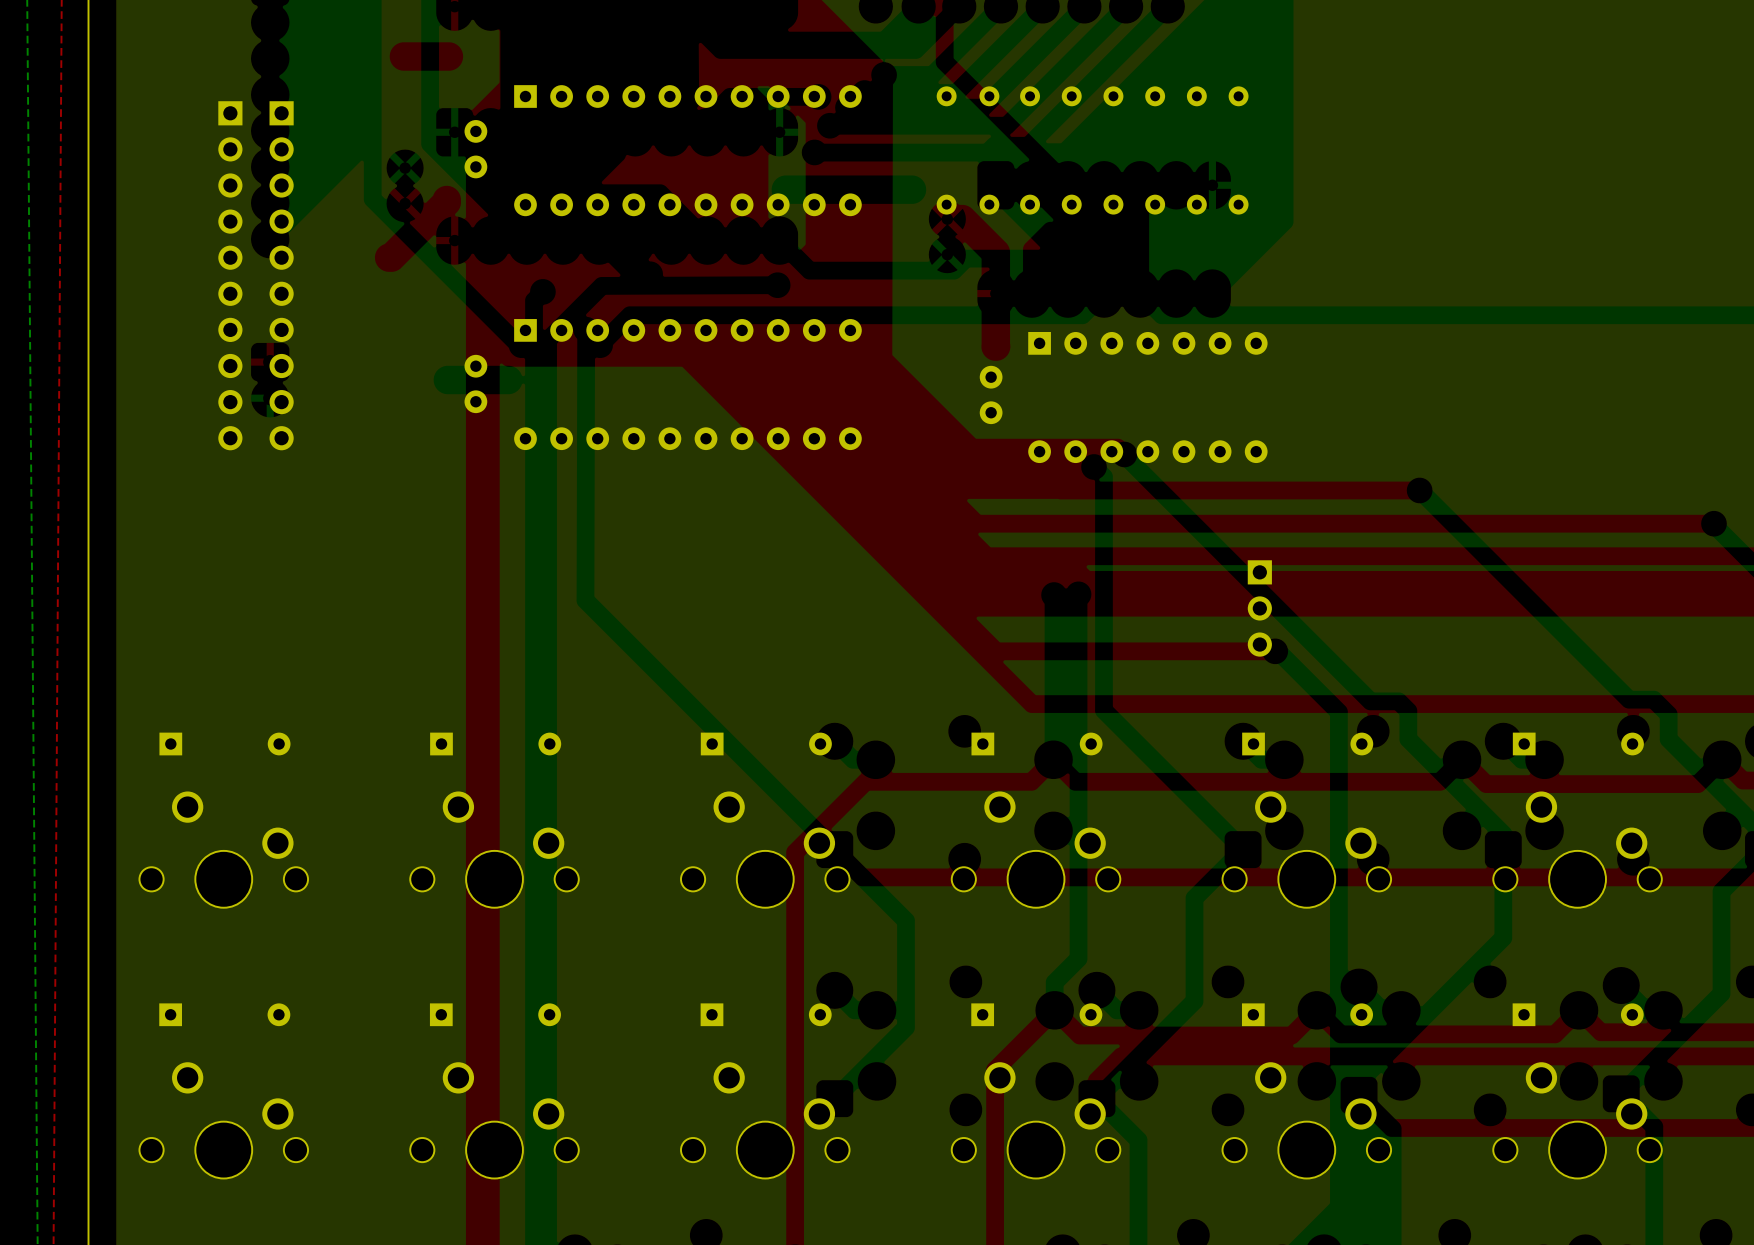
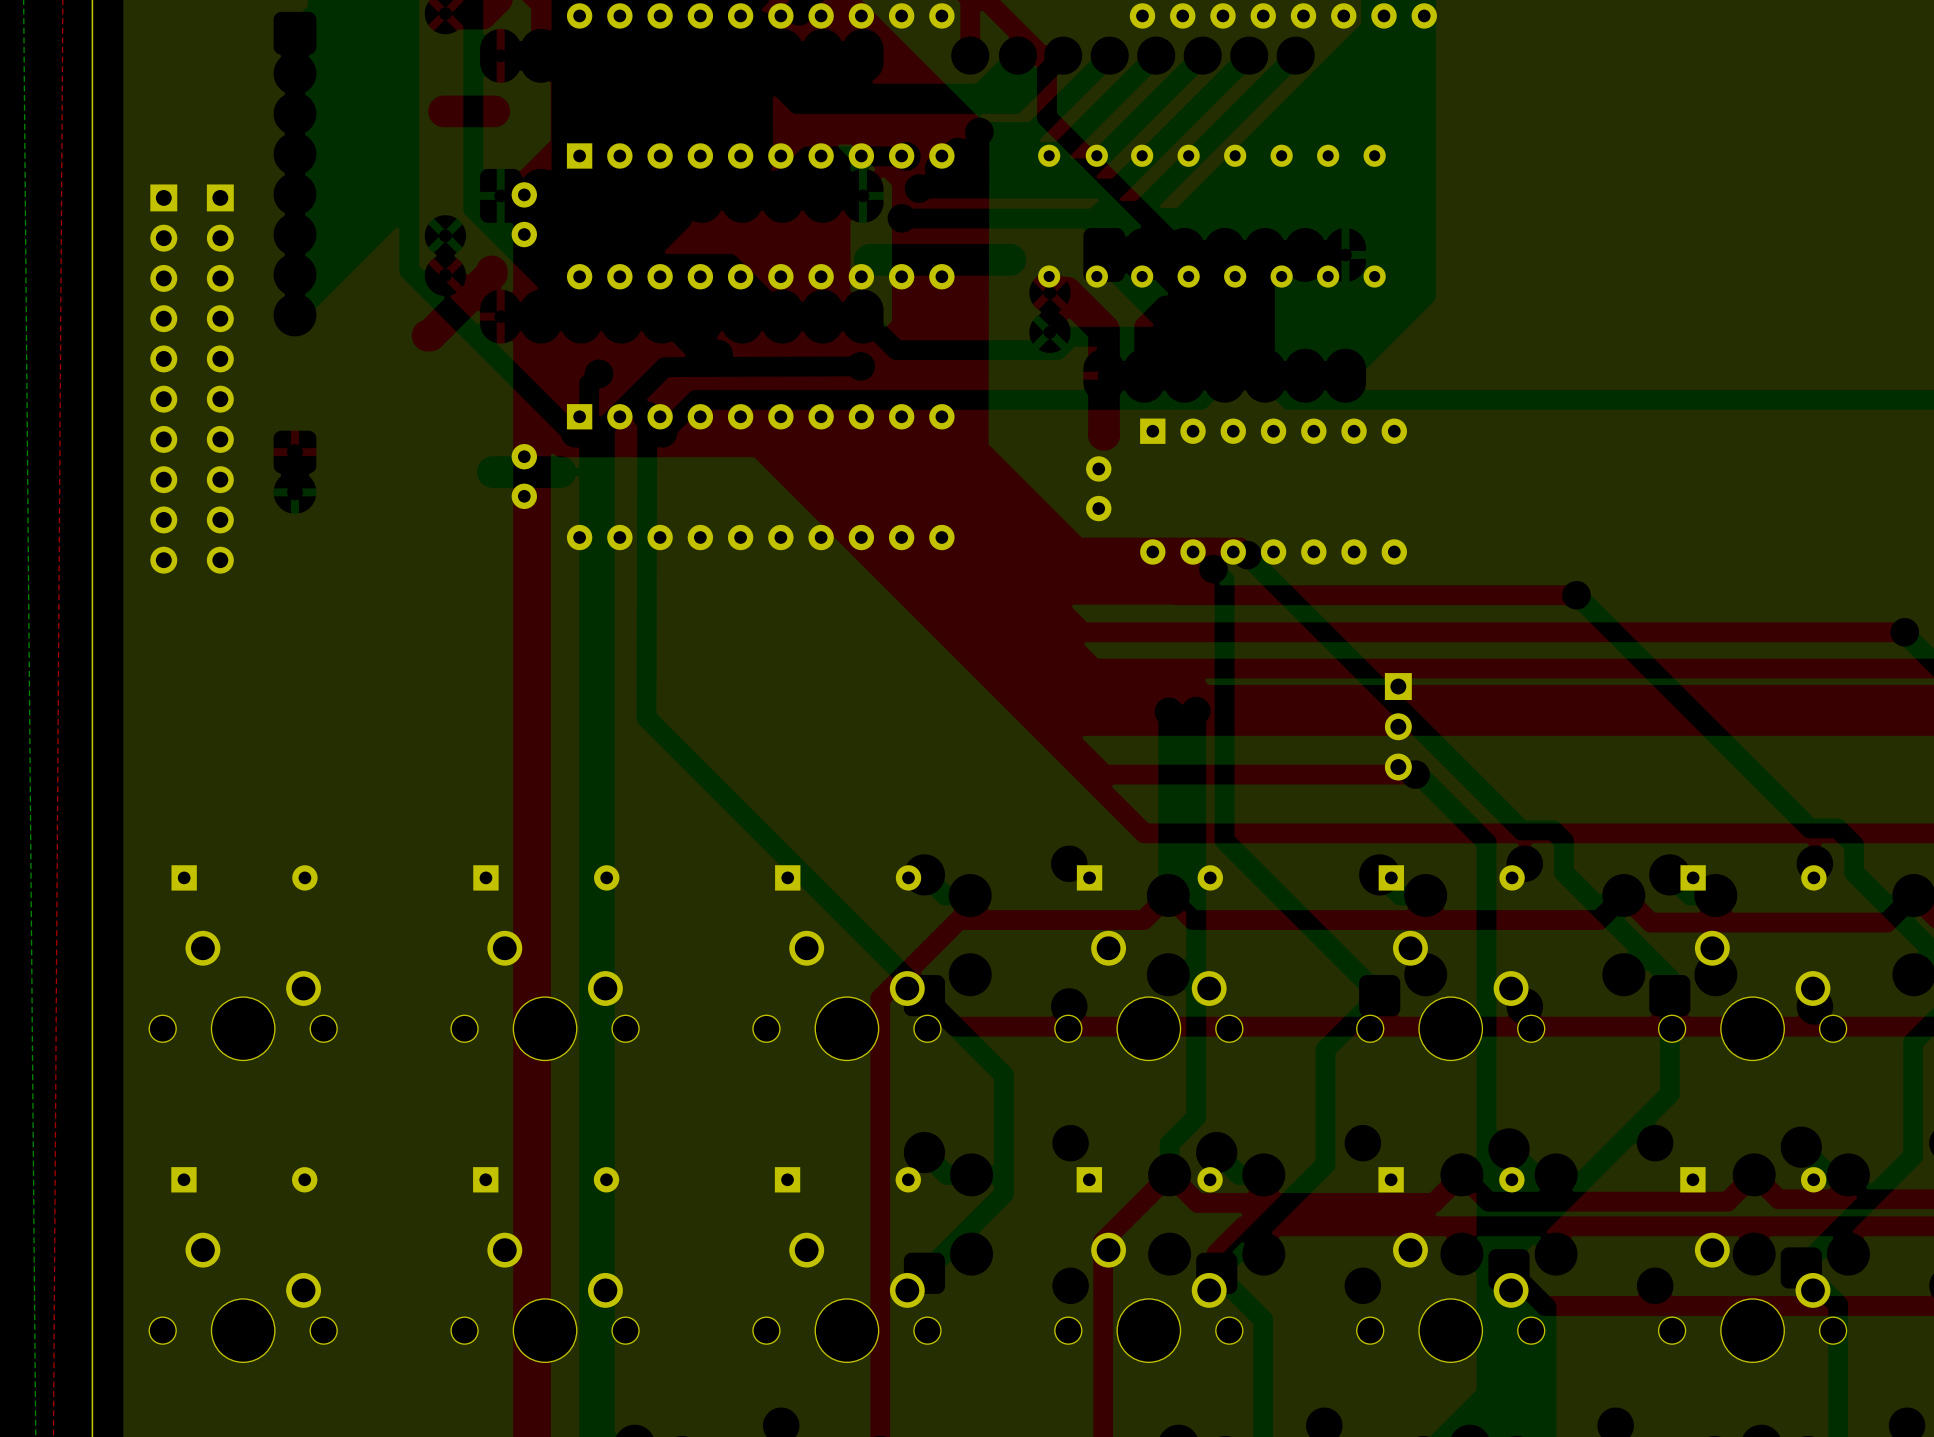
part position: (230, 275) -> (220, 379)
part: (281, 275) -> none
part: none -> (163, 379)

